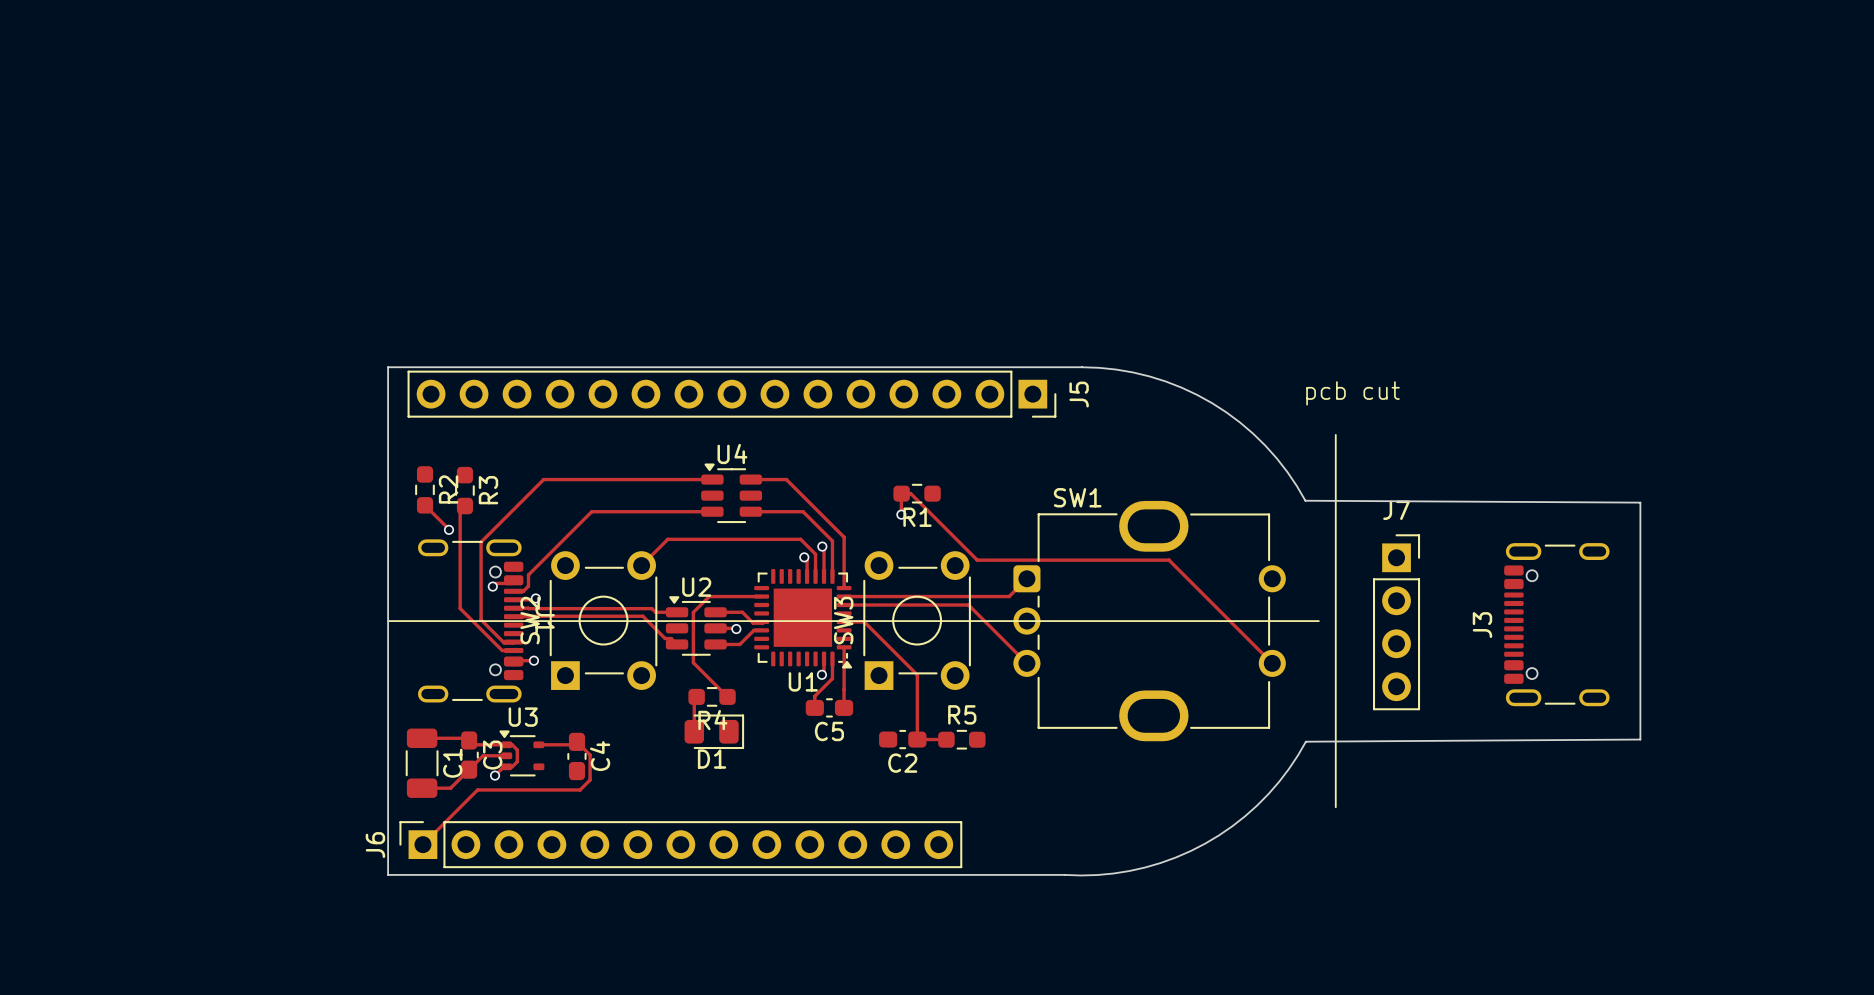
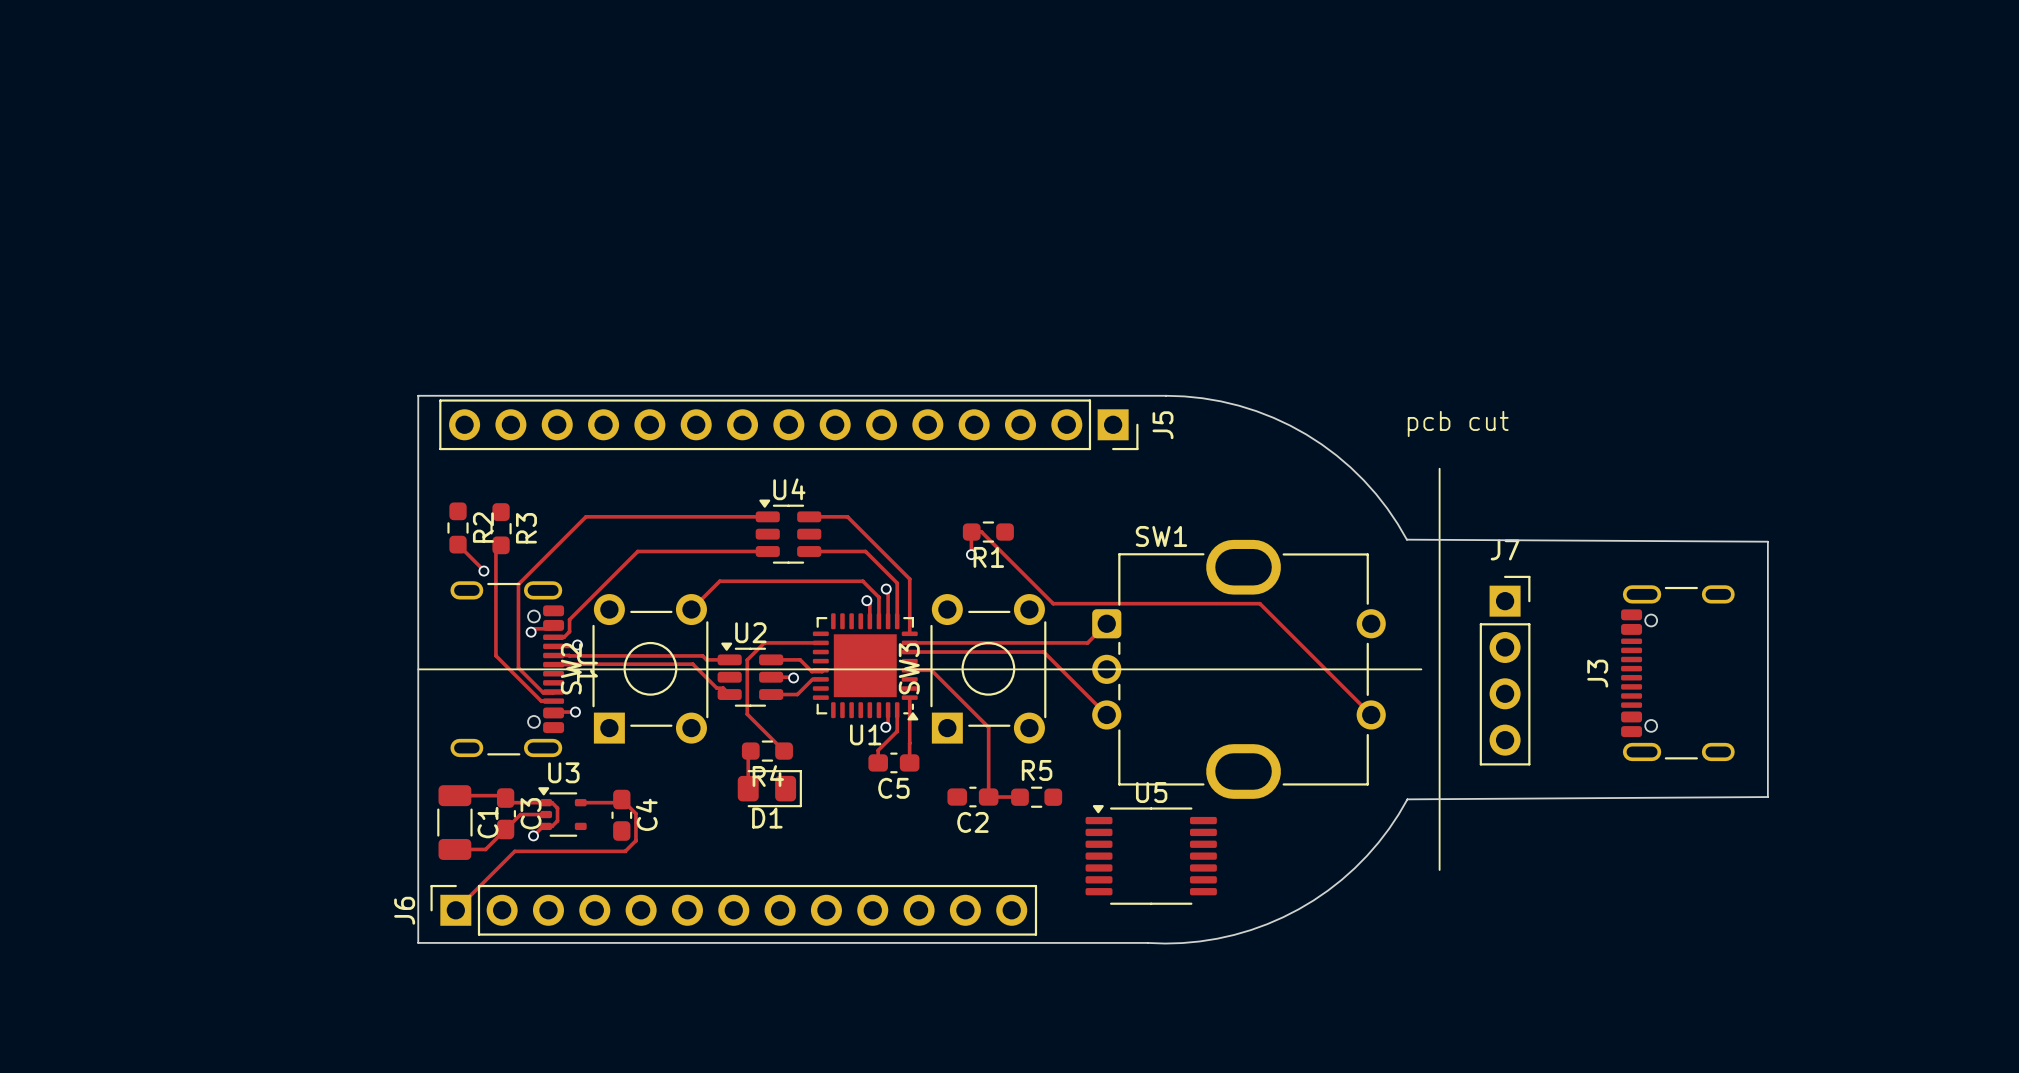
U5: none -> (1151, 854)

